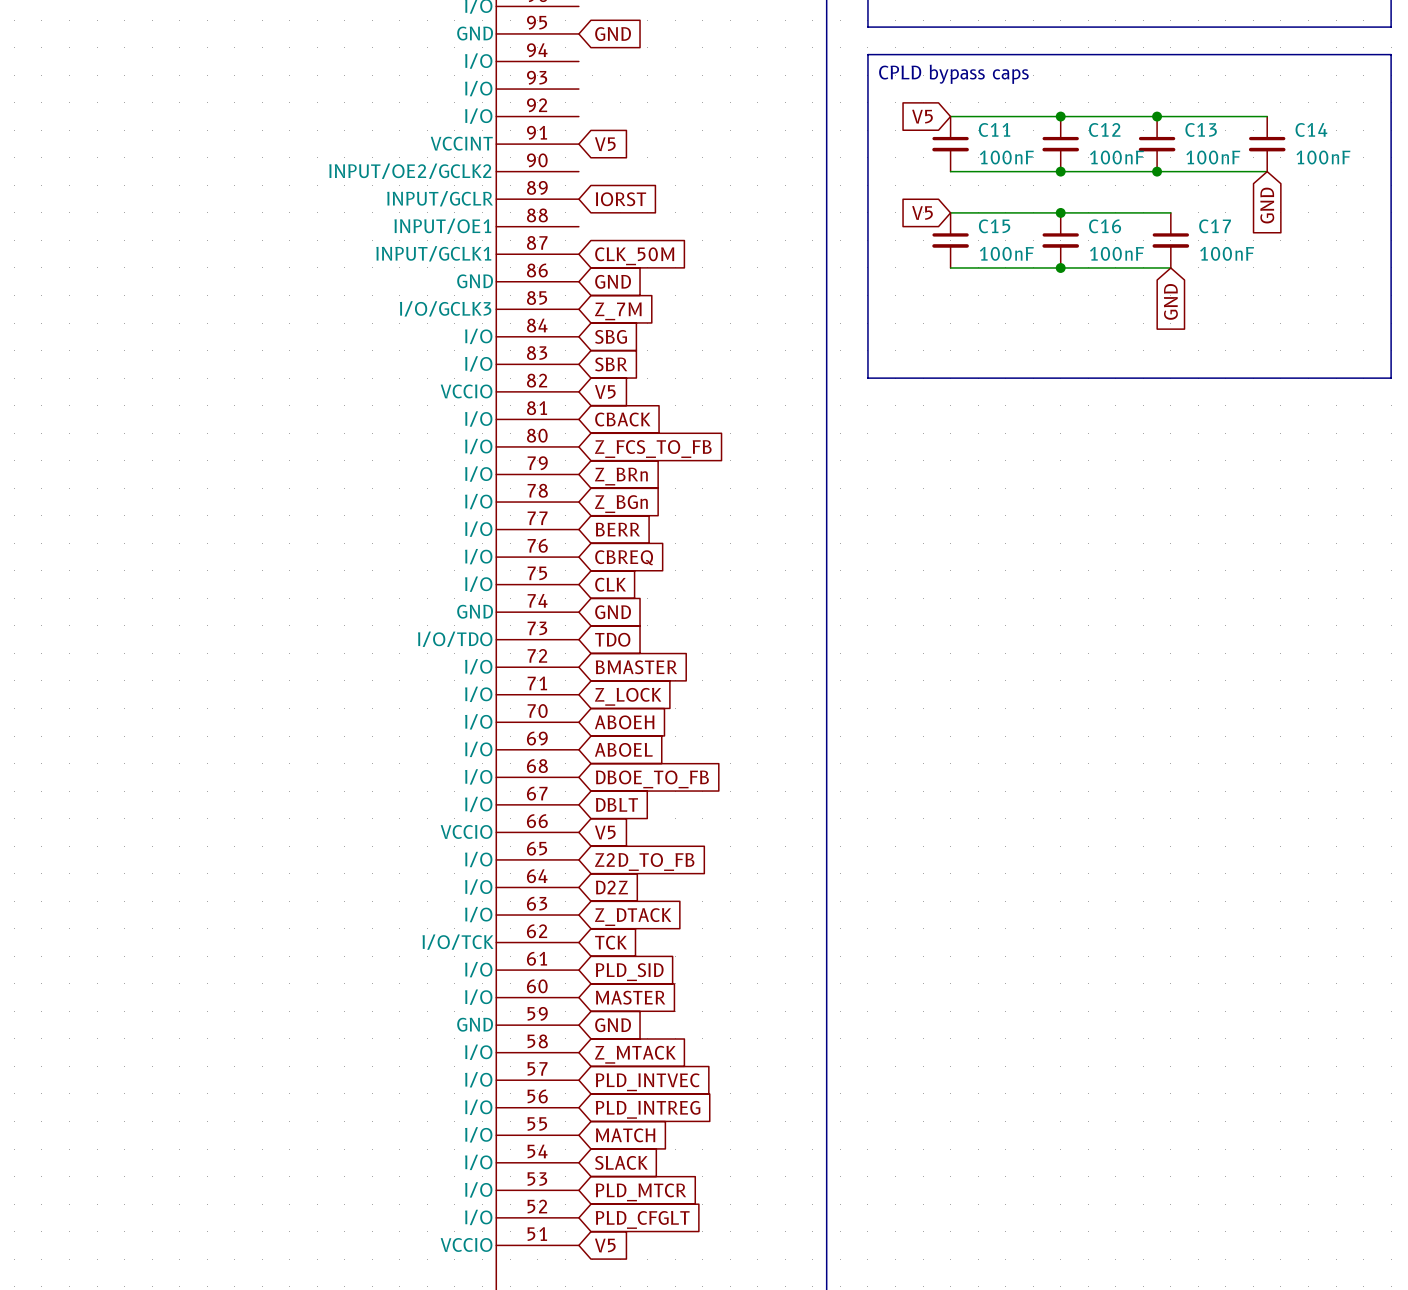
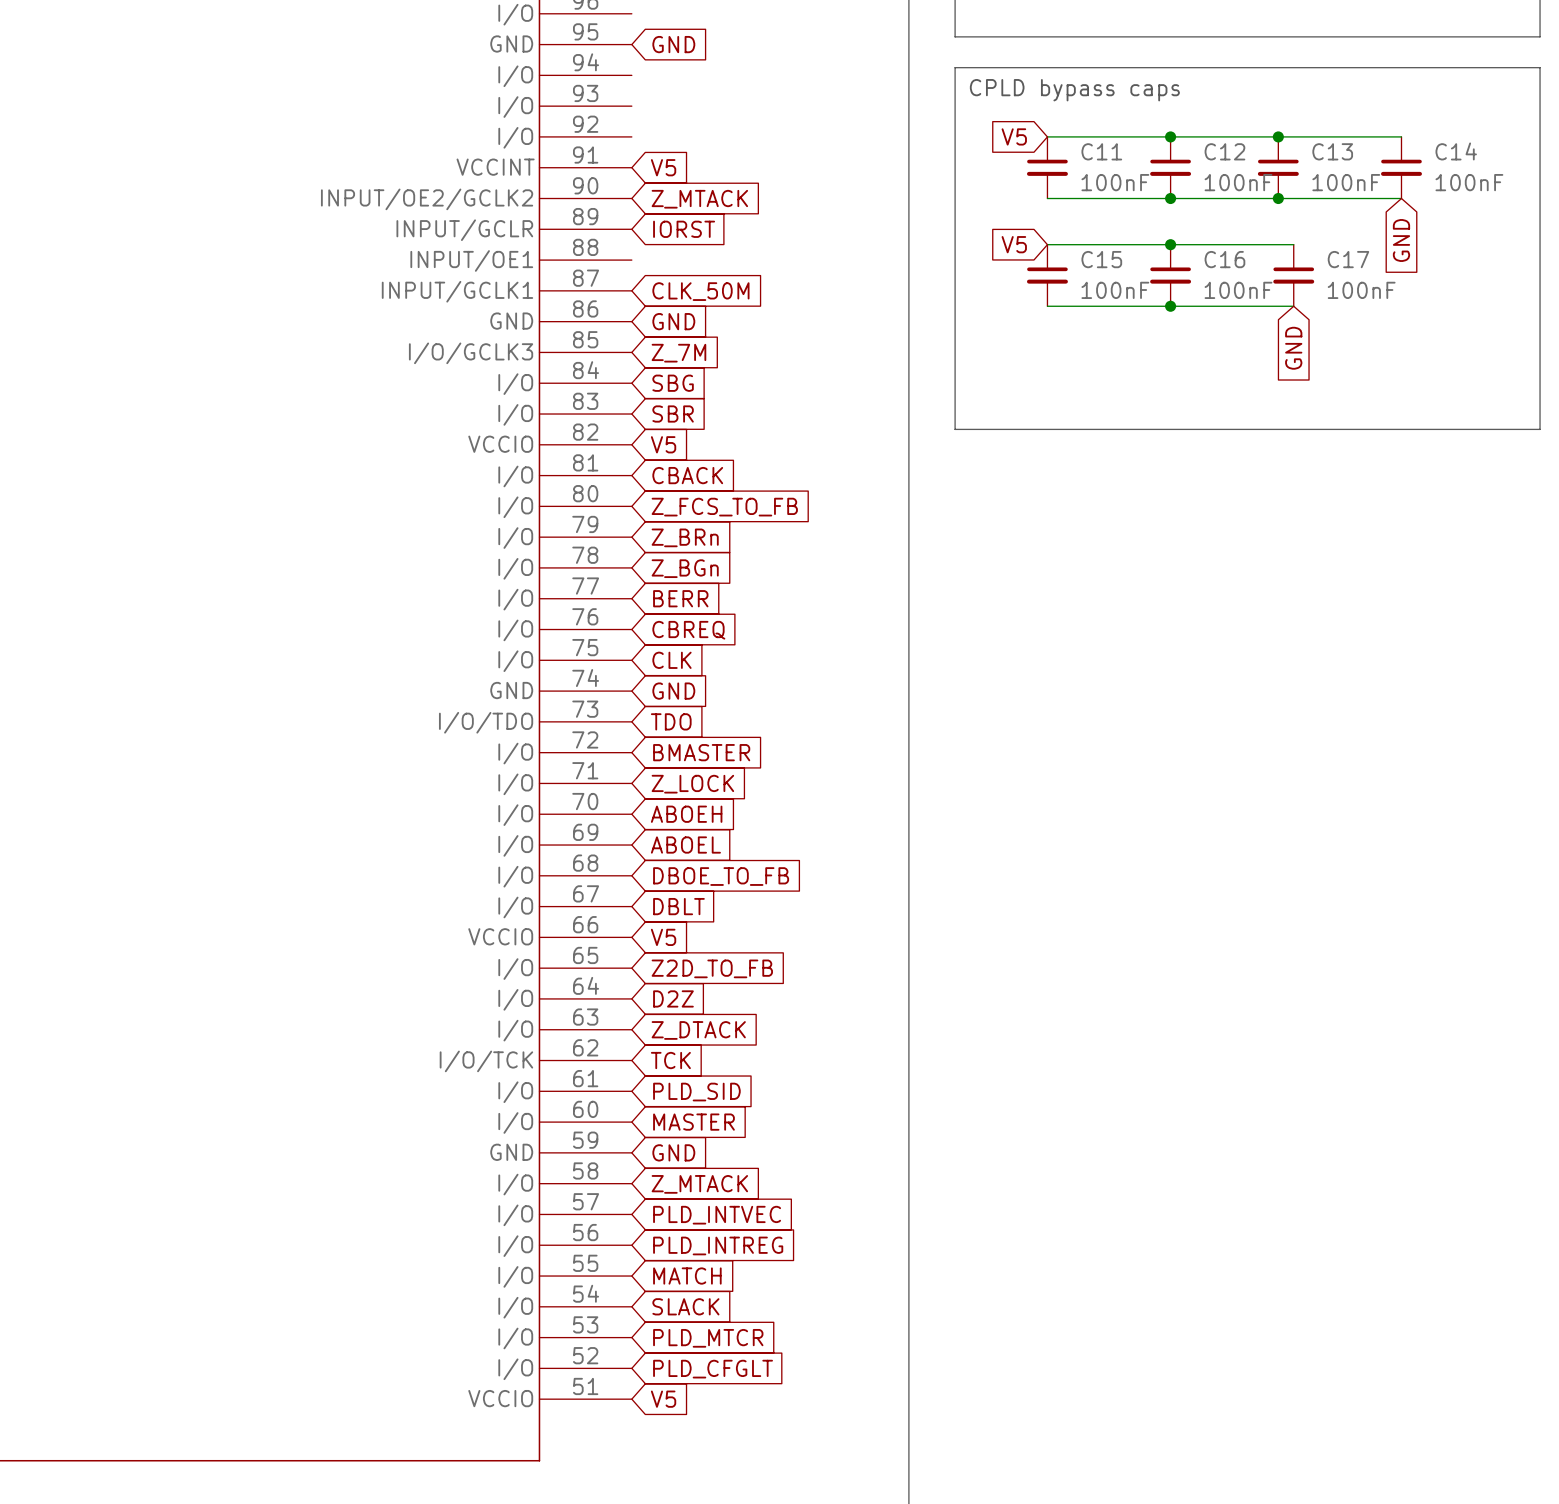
global label: none -> Z_MTACK (699, 199)

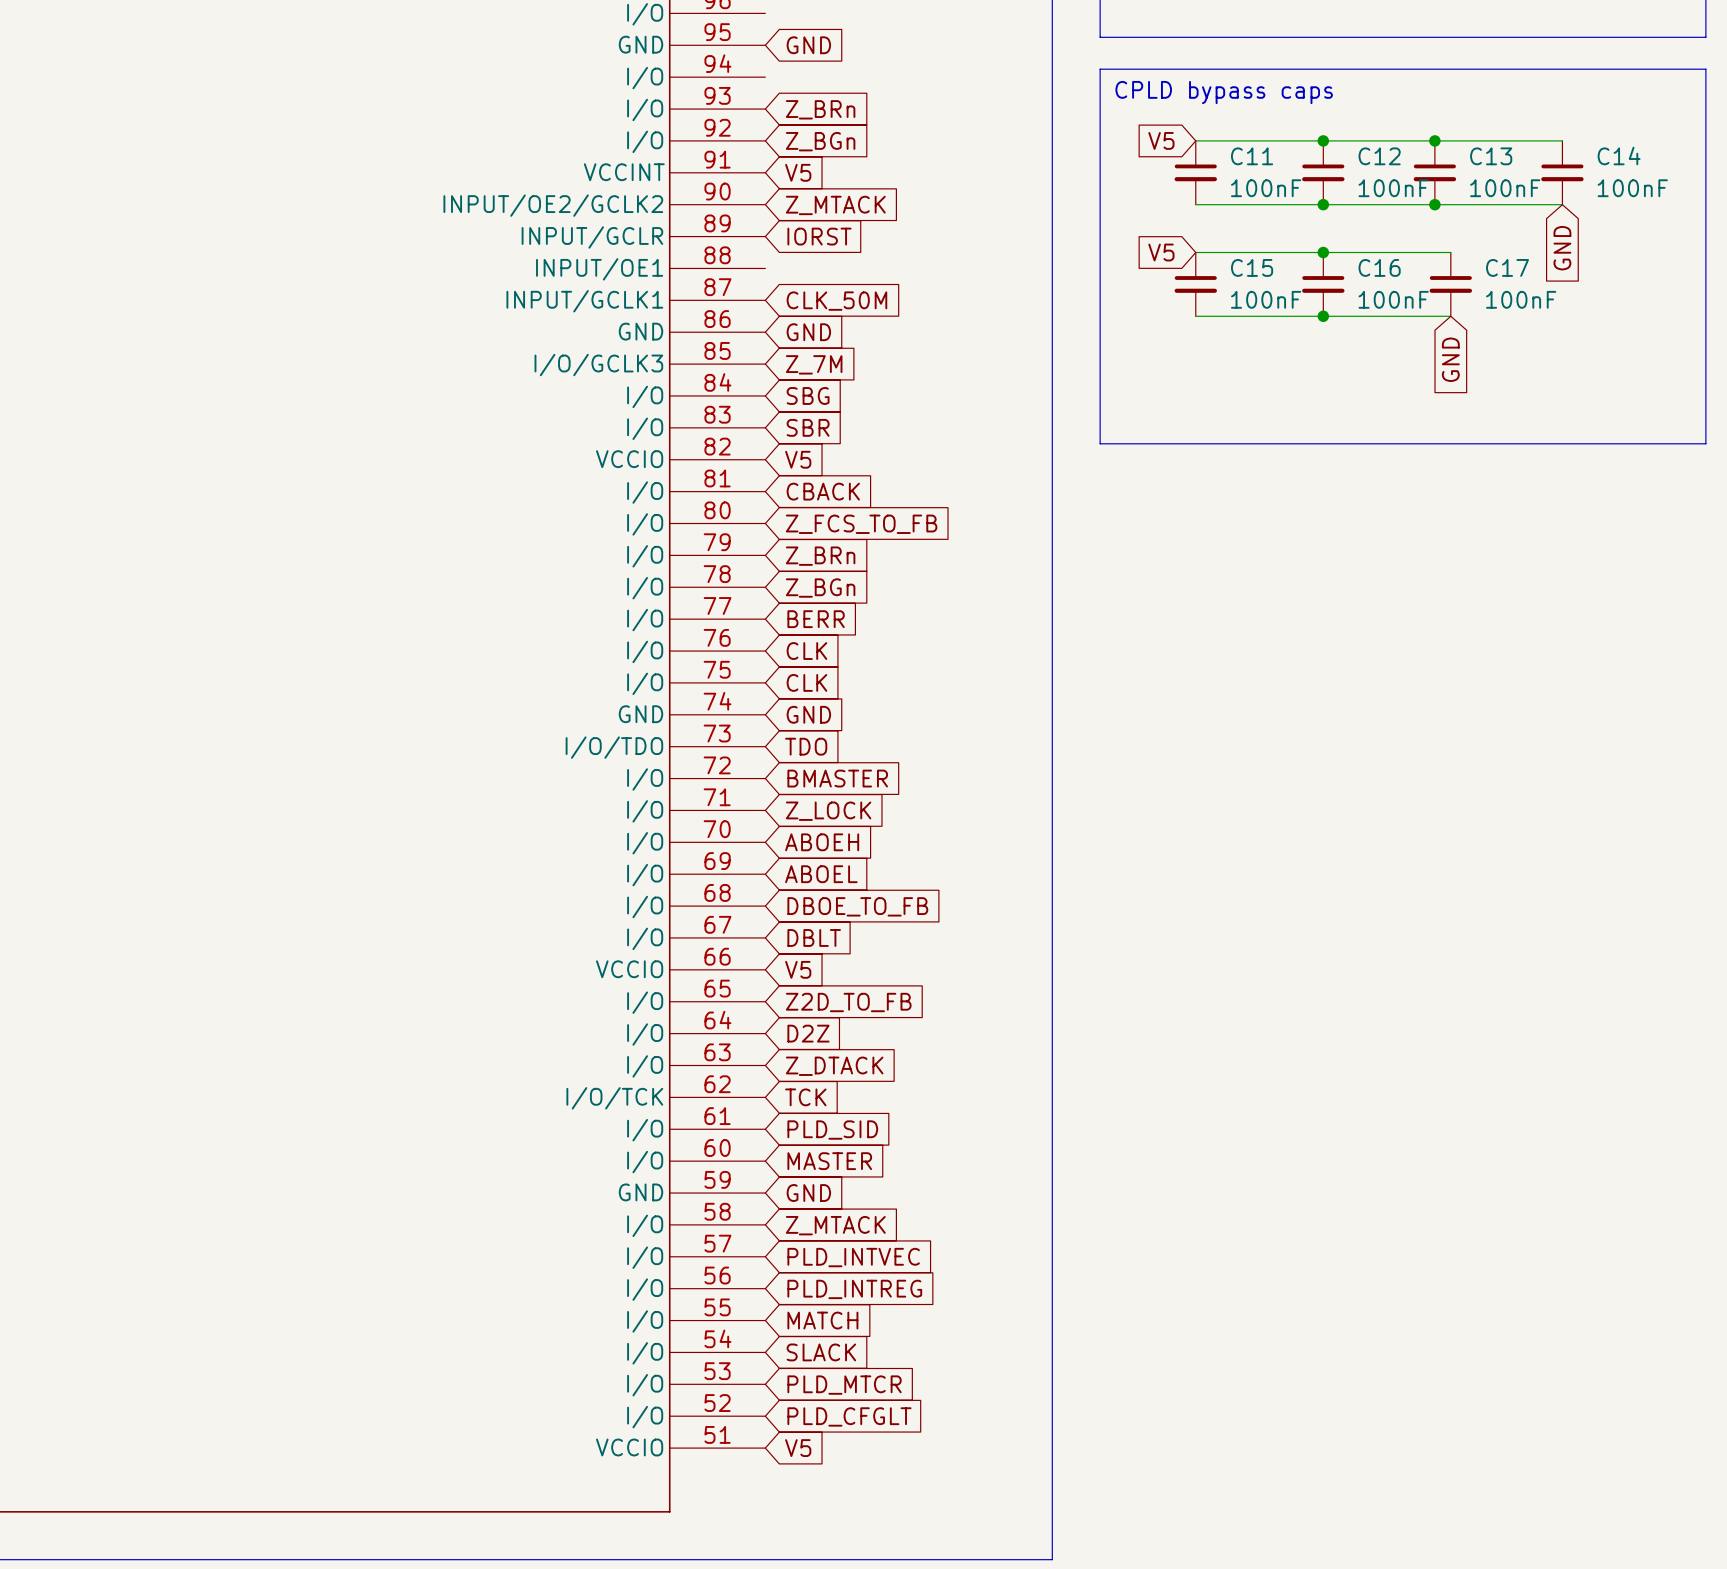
global label: none -> Z_BRn (820, 109)
global label: none -> Z_BGn (820, 141)
global label: CBREQ (688, 630) -> CLK (806, 651)

